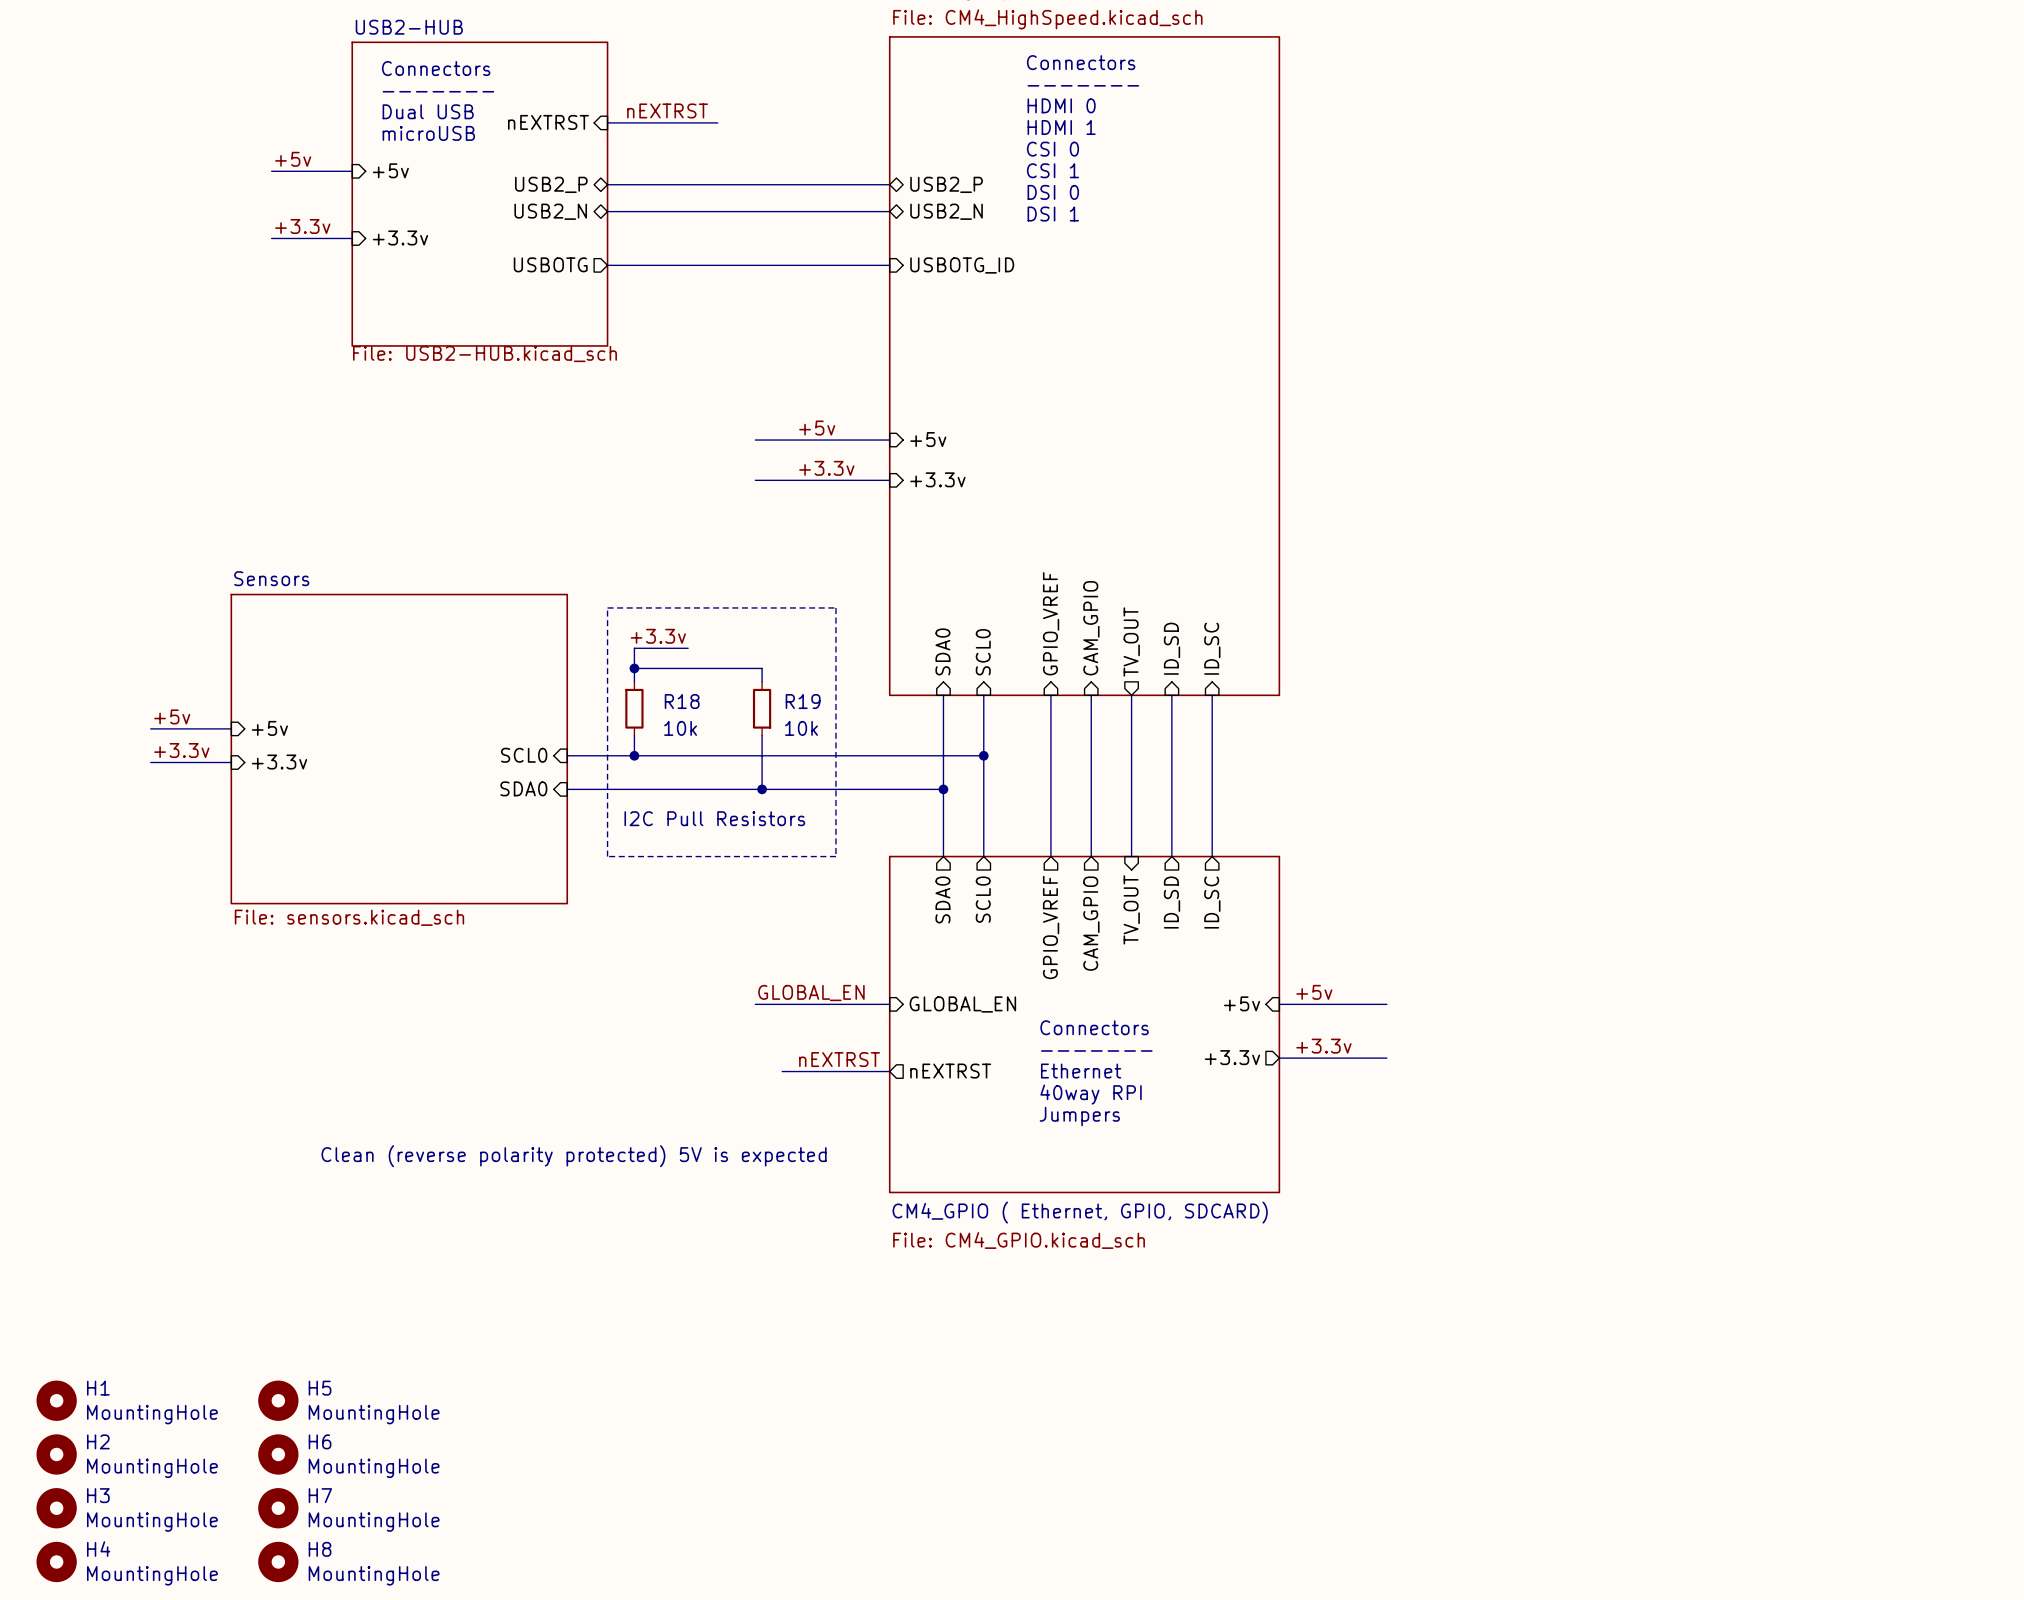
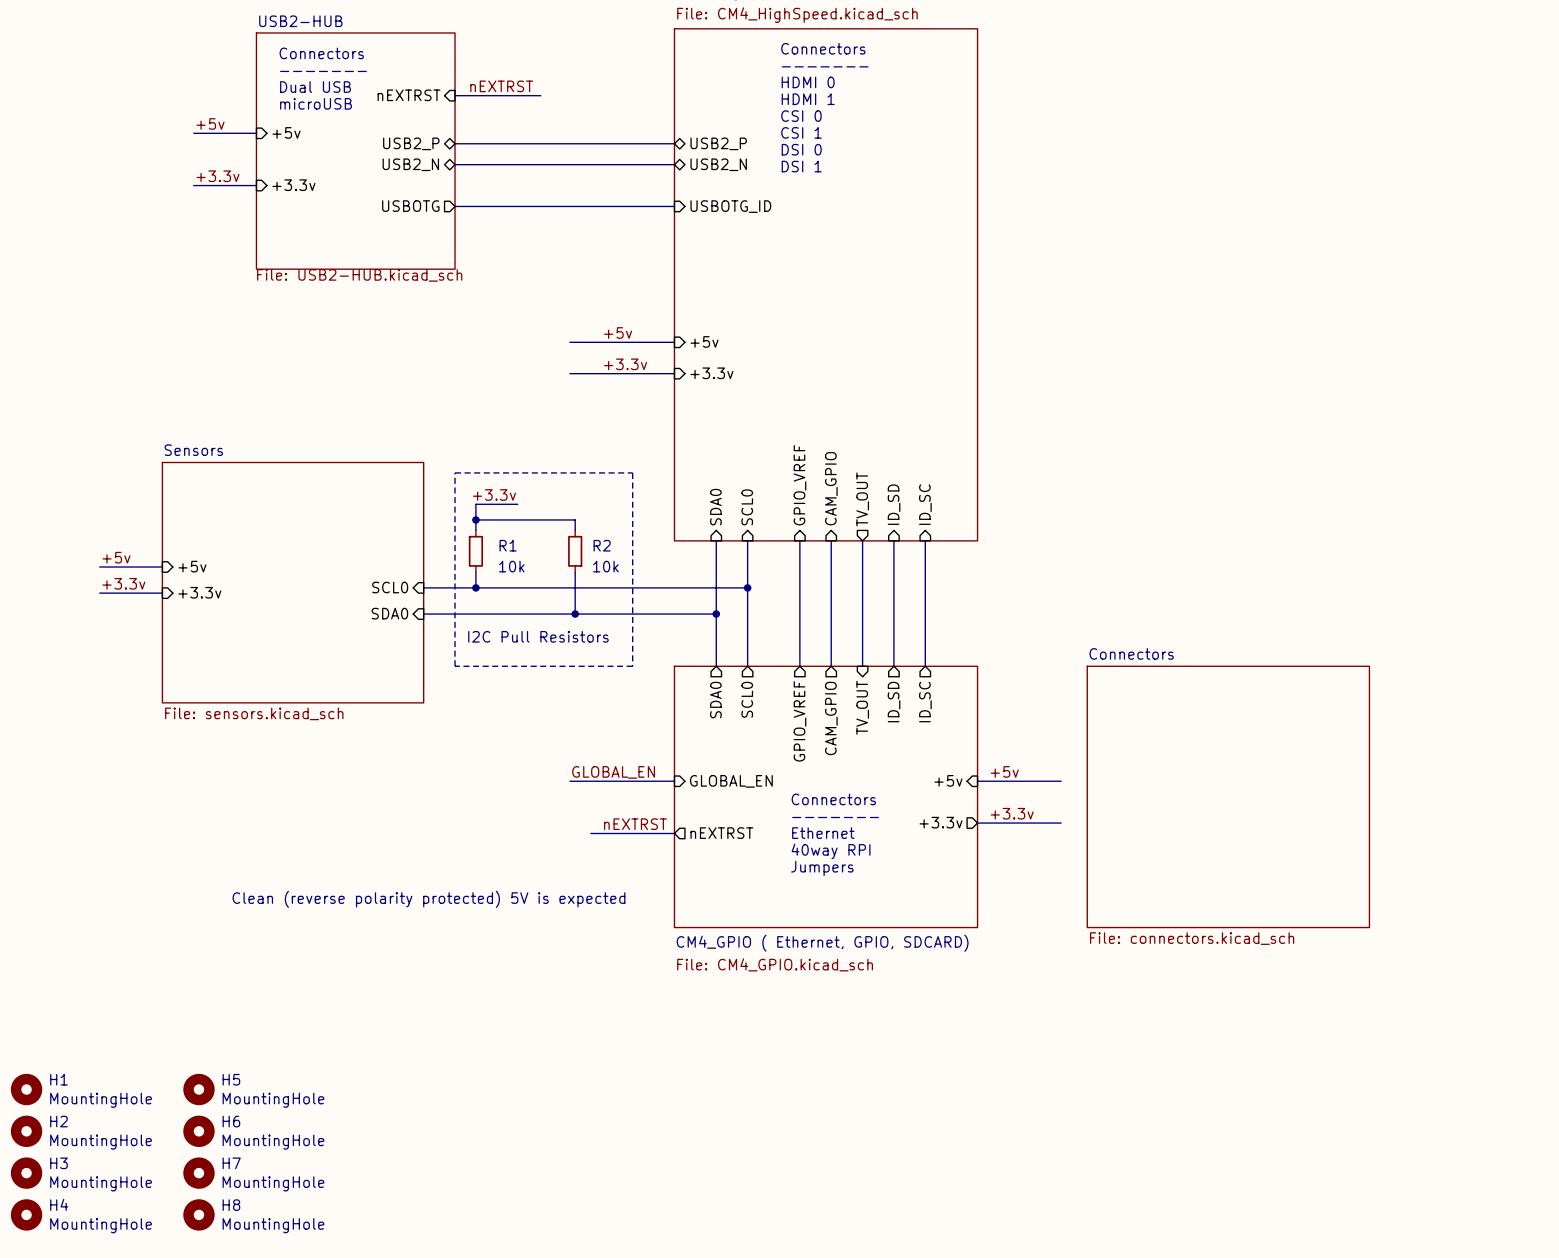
R18 name: R18 (682, 701) -> R1 (508, 545)
R19 name: R19 (803, 701) -> R2 (602, 545)
sheet Connectors: none -> File: connectors.kicad_sch (1228, 796)

